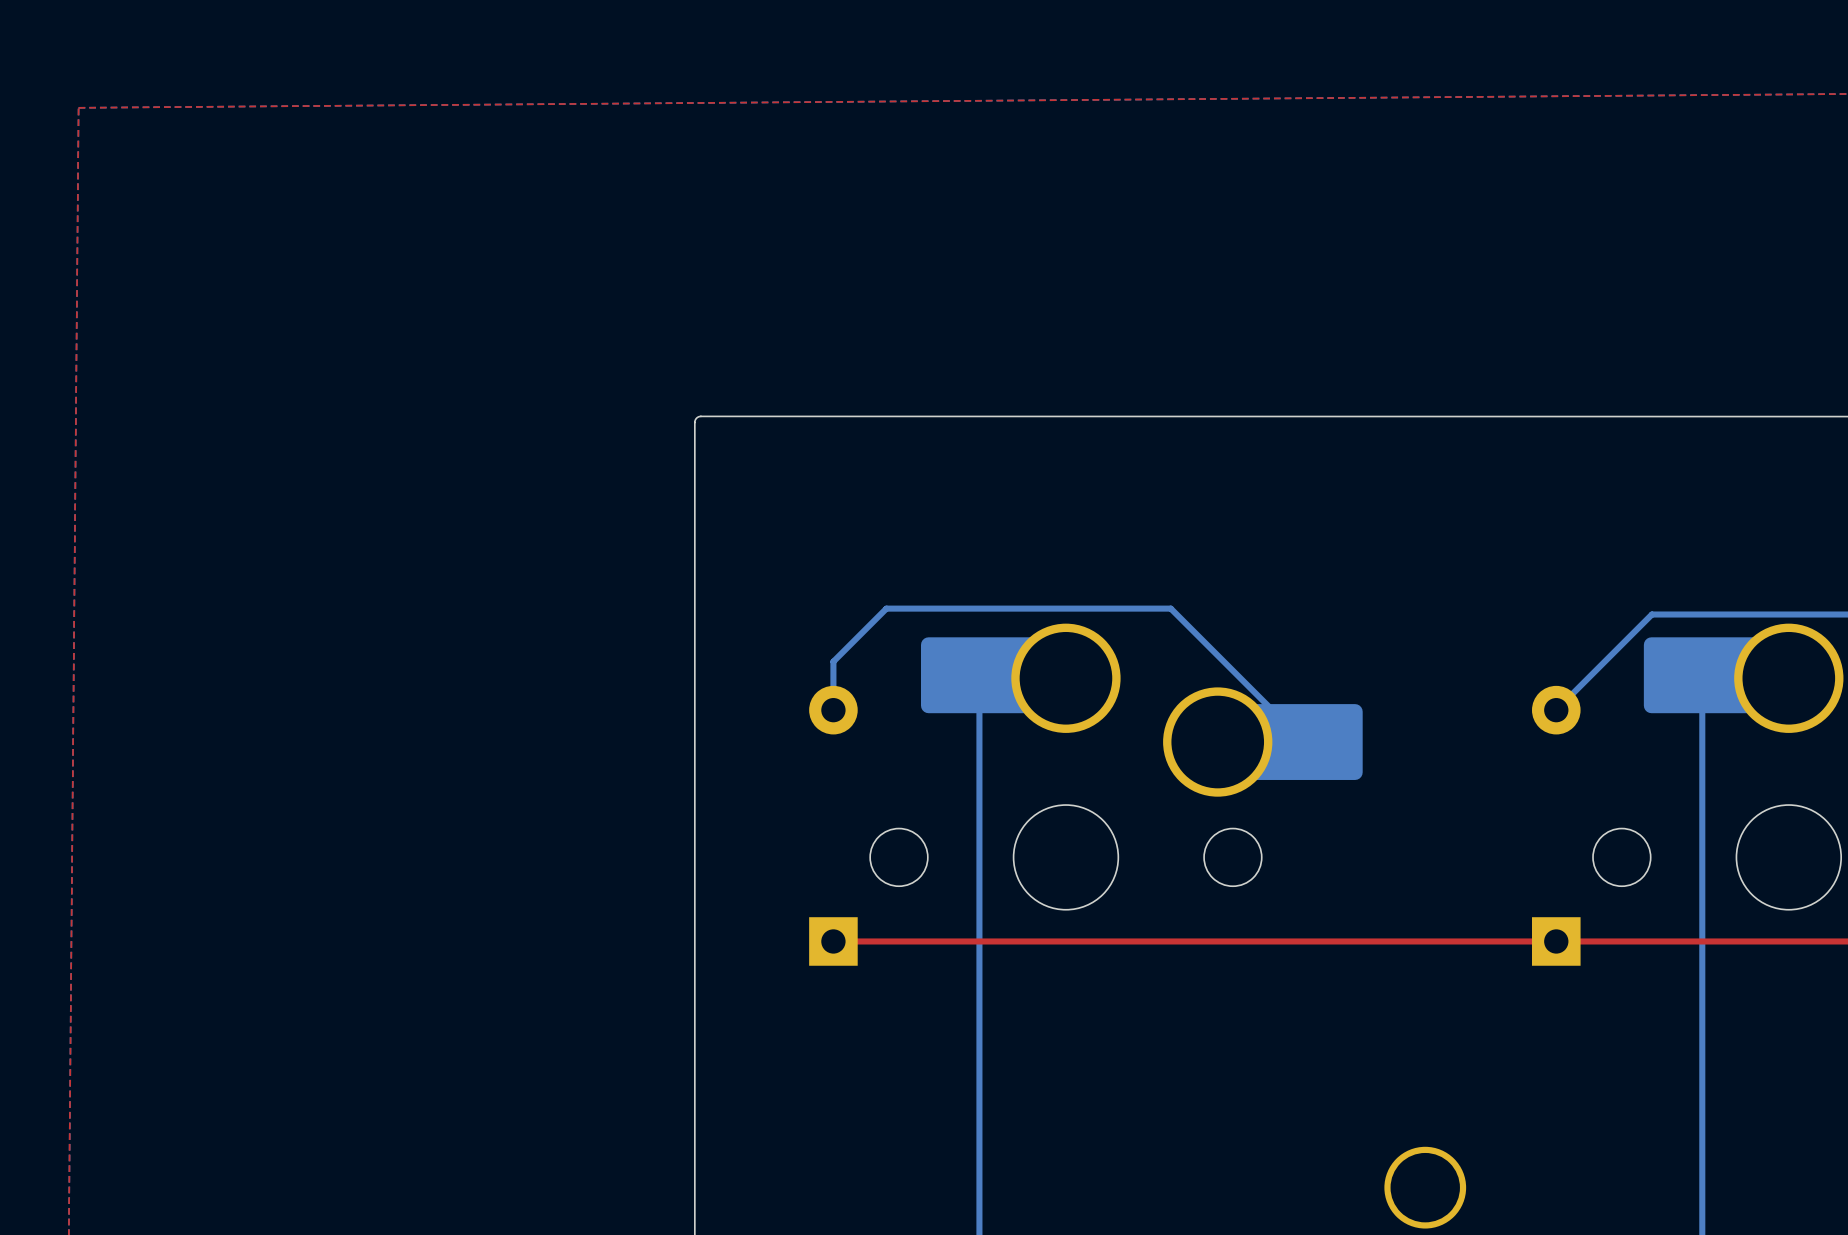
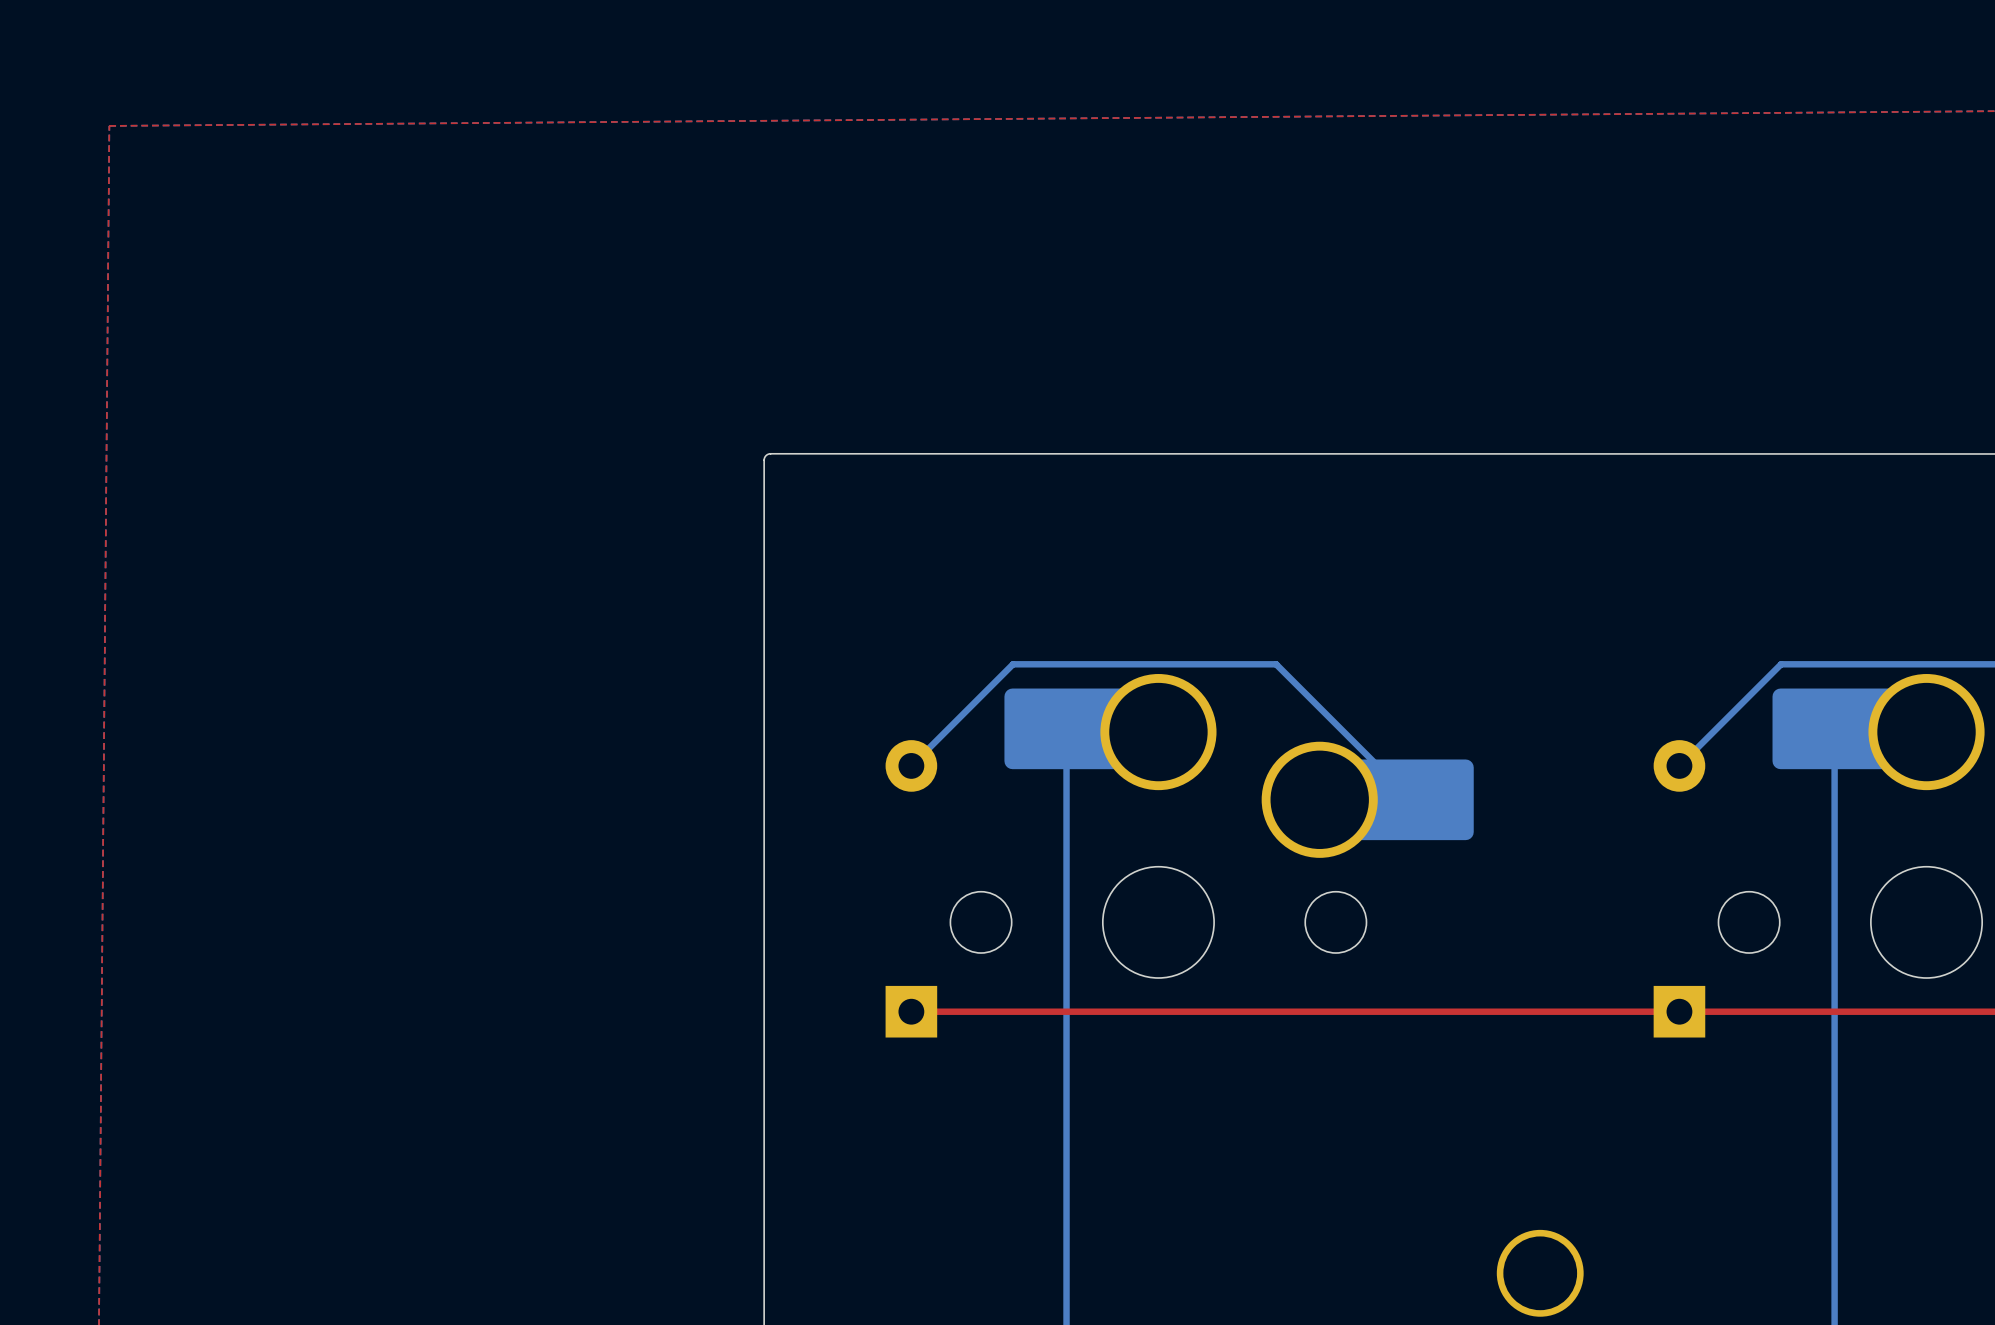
bottom track: (1176, 614) (1170, 608) (886, 608) (833, 661) (833, 710) -> (1276, 664) (1013, 664) (911, 765)

